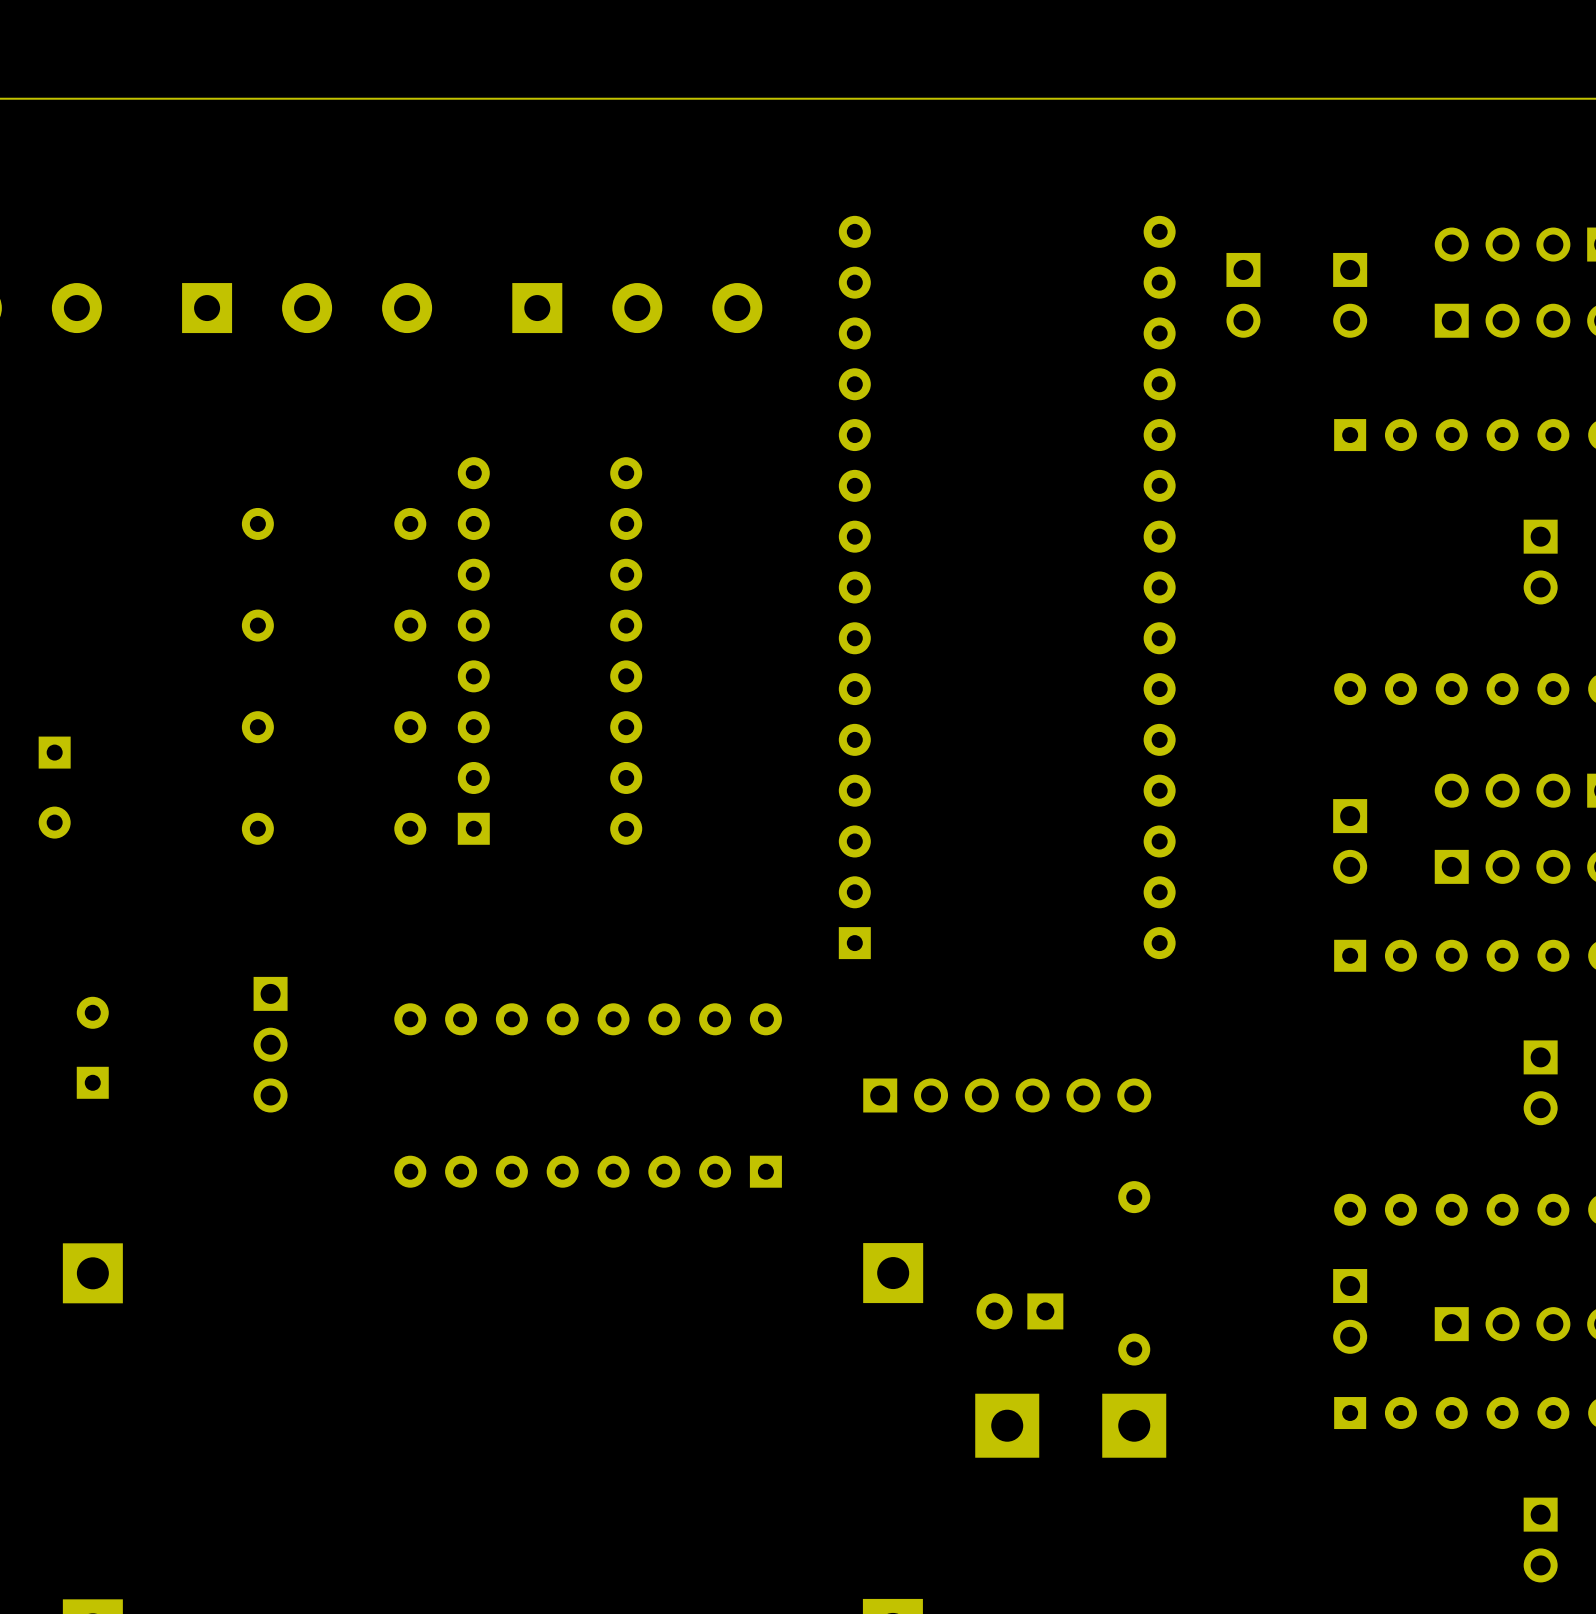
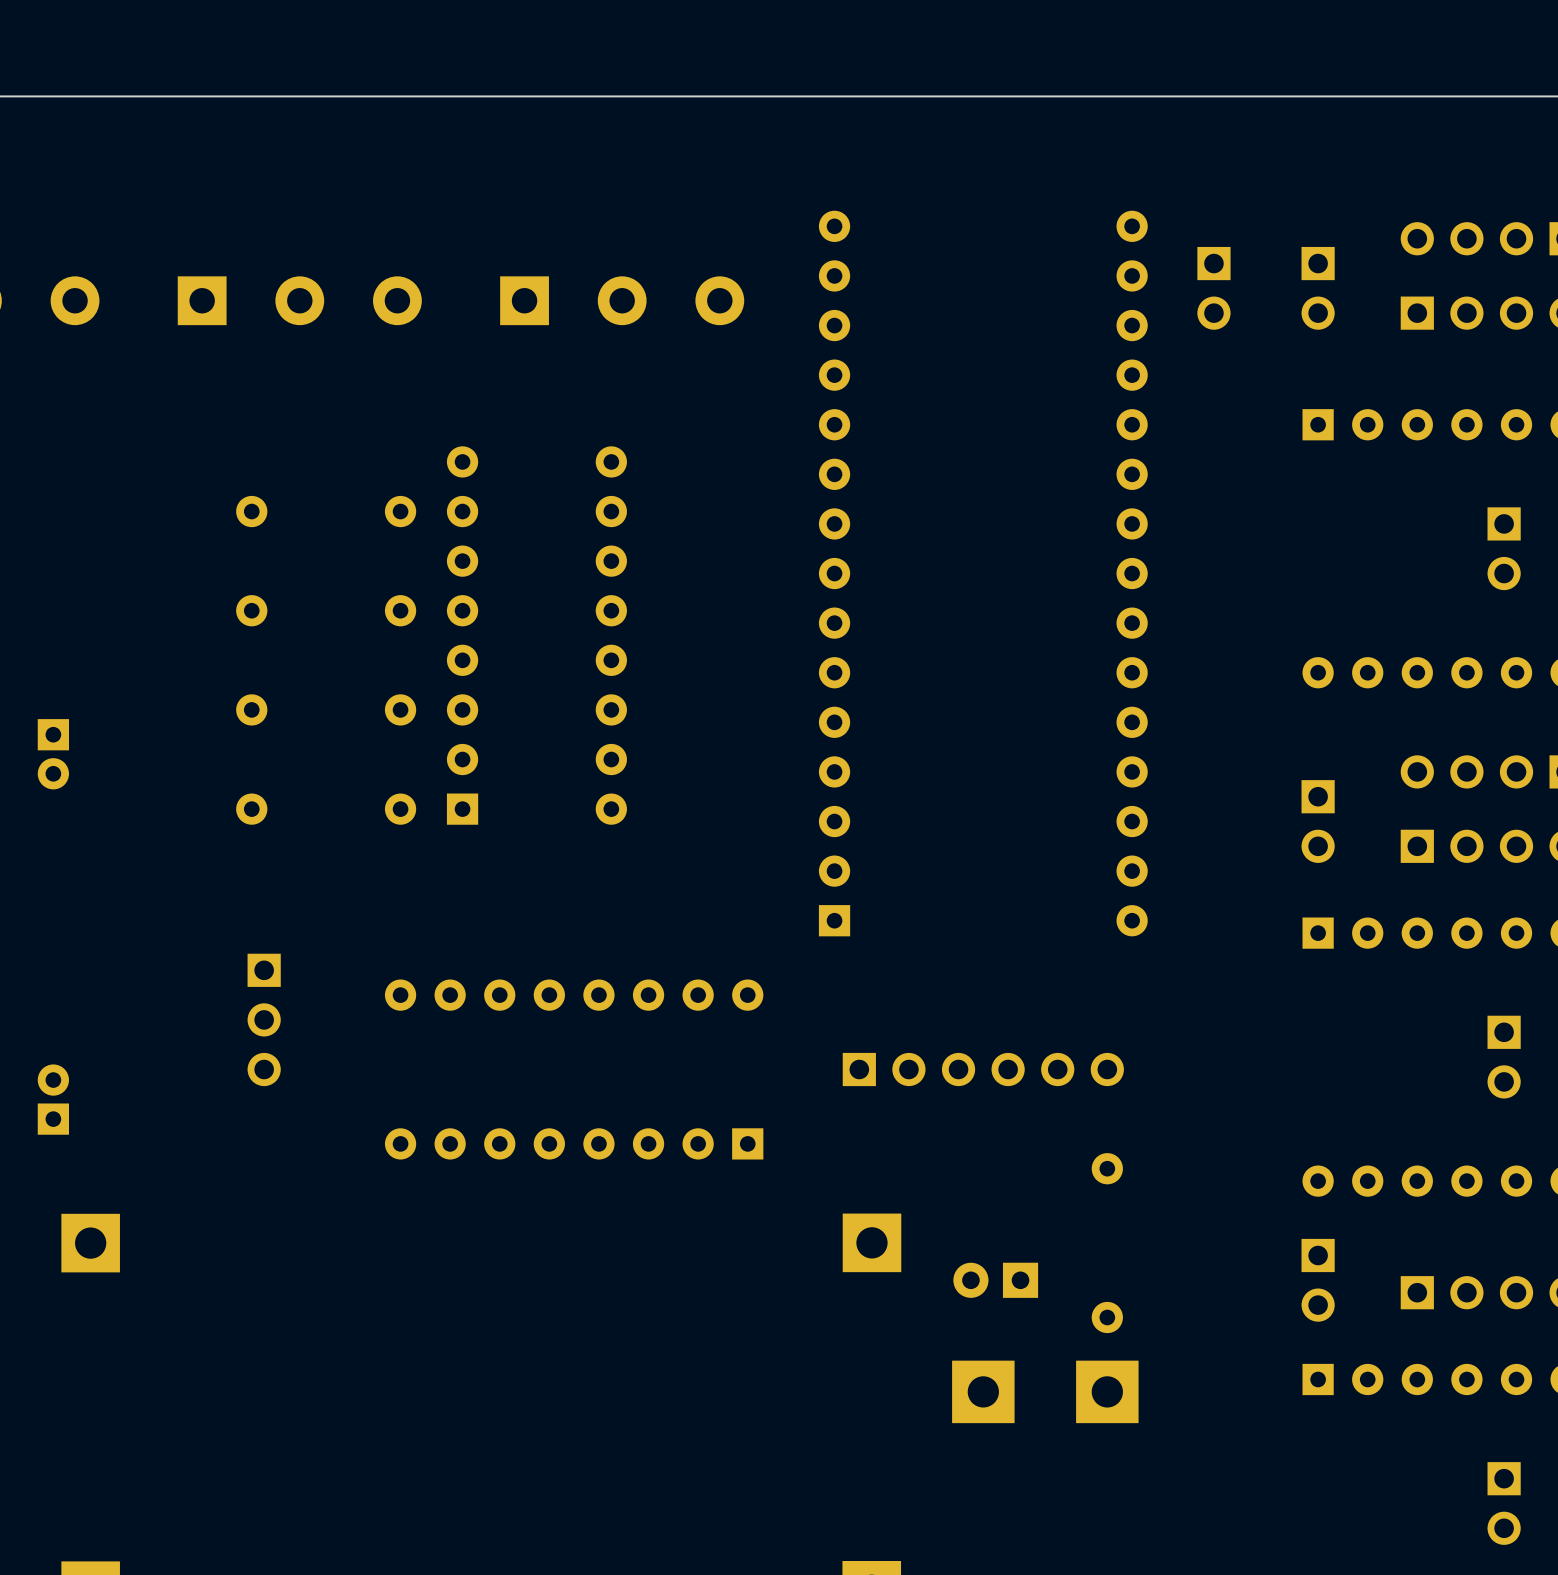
part footprint: [38, 736, 71, 839] -> [37, 719, 69, 790]
part: (92, 1047) -> none
part: none -> (53, 1099)

